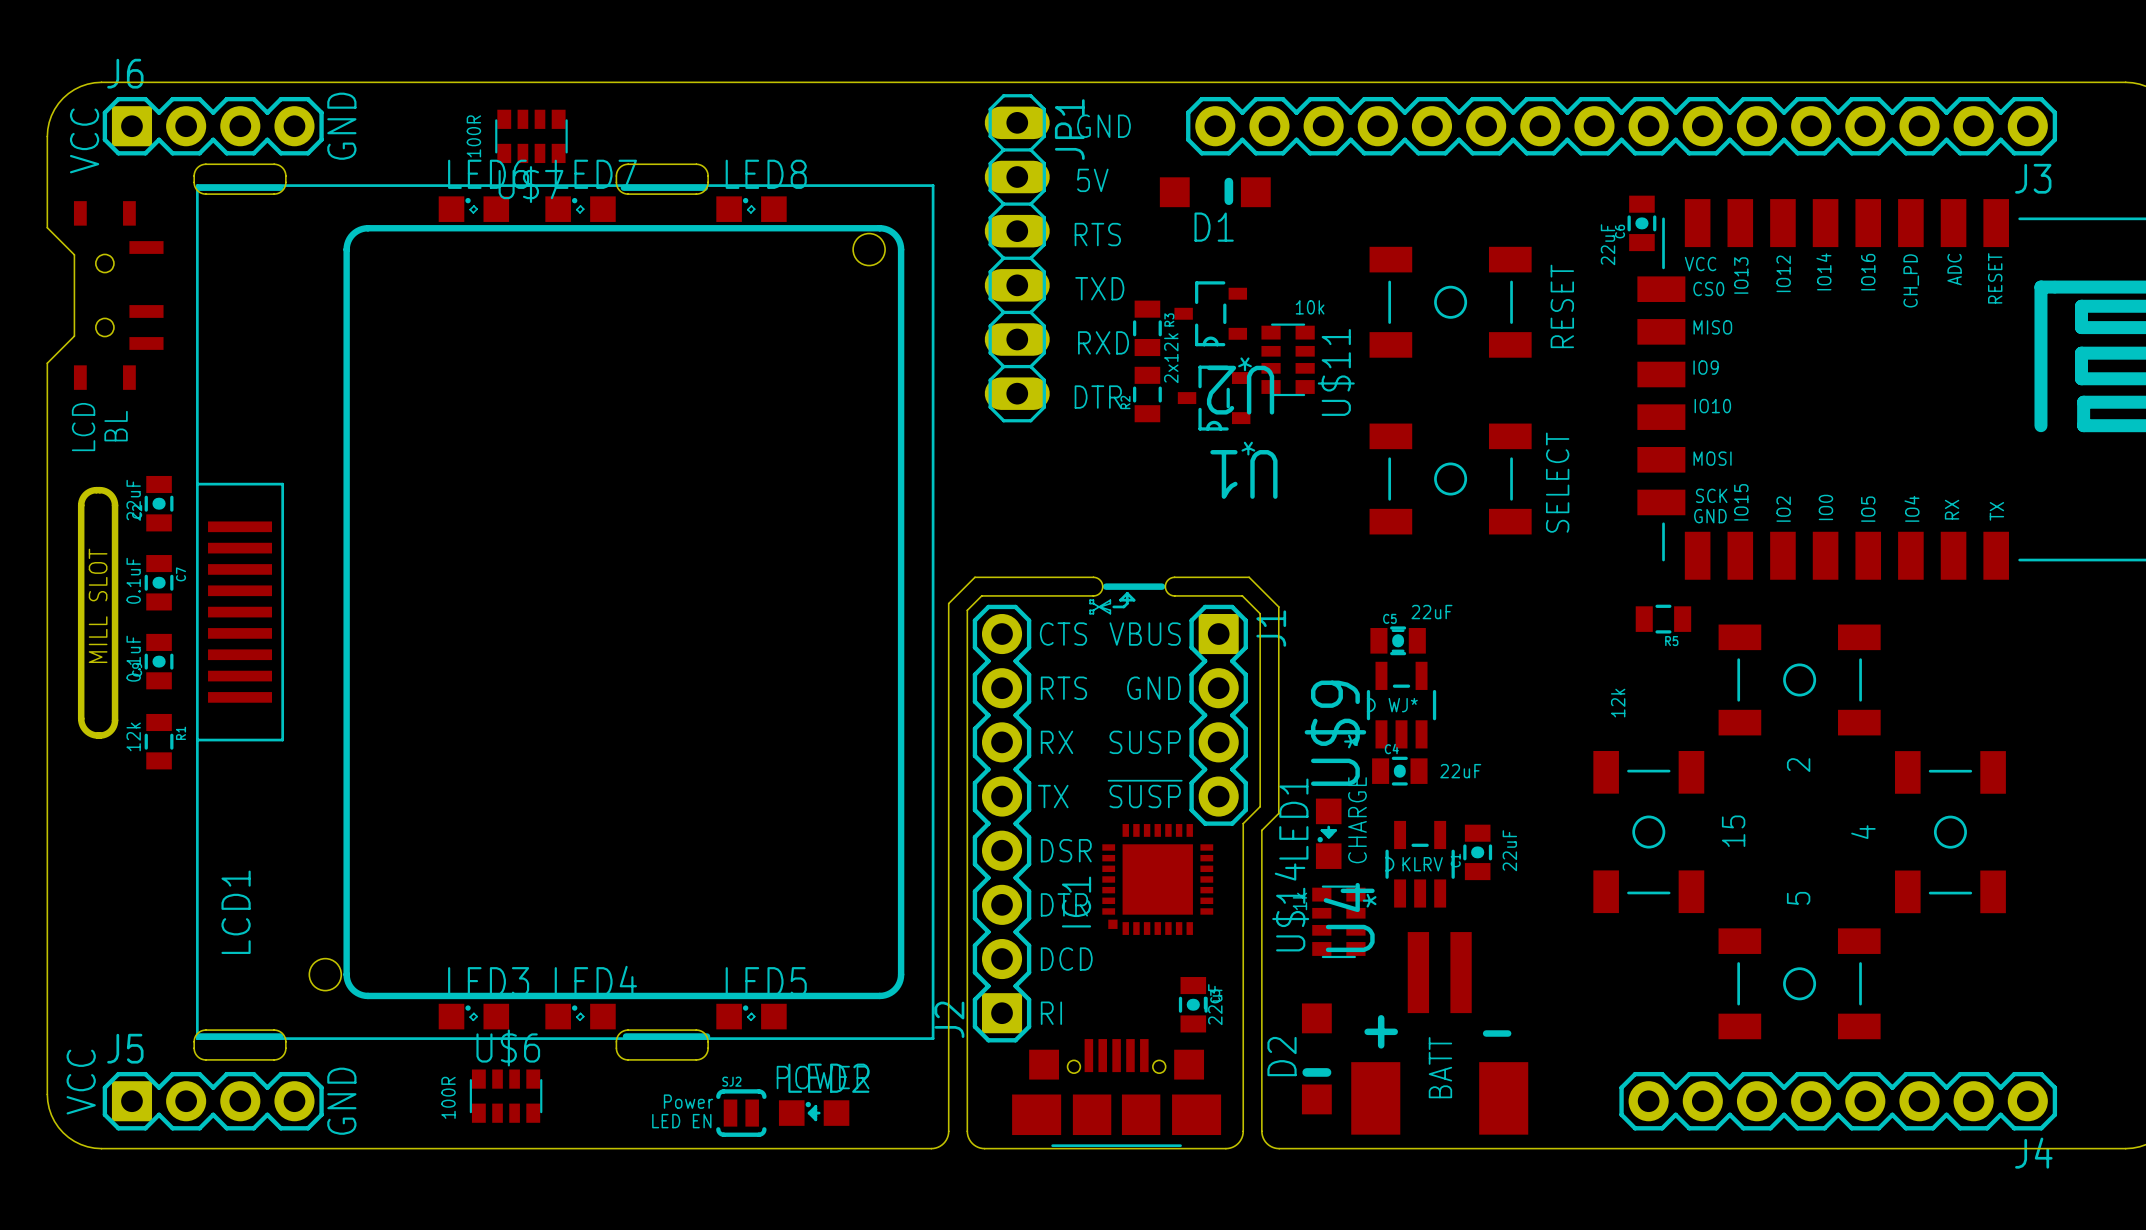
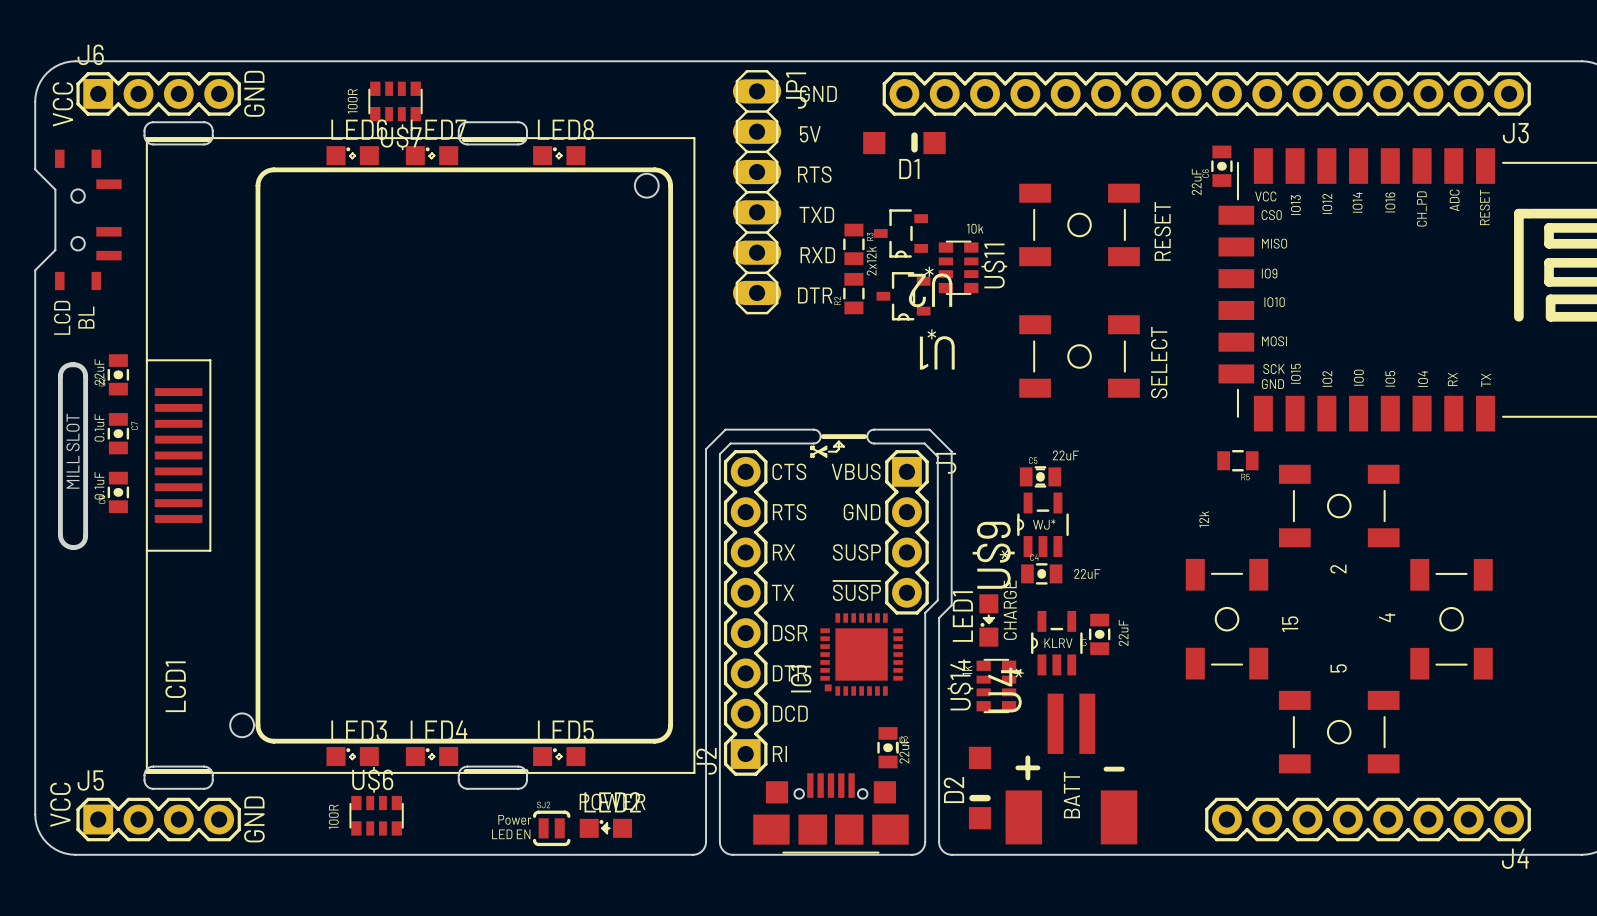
text: 12k (133, 736) -> none
R1: (159, 741) -> none

